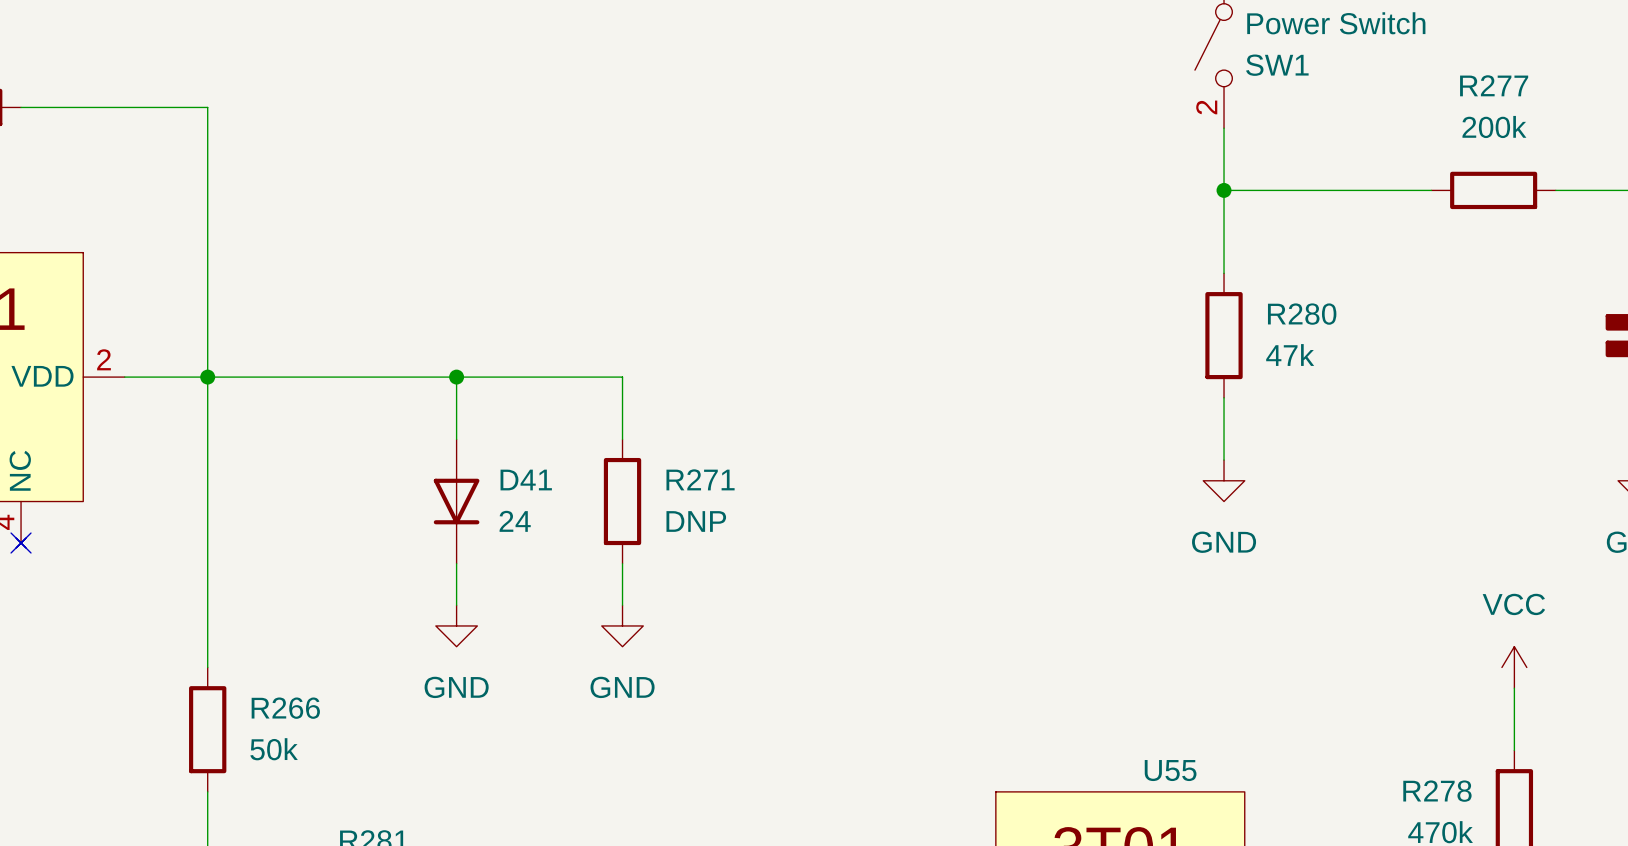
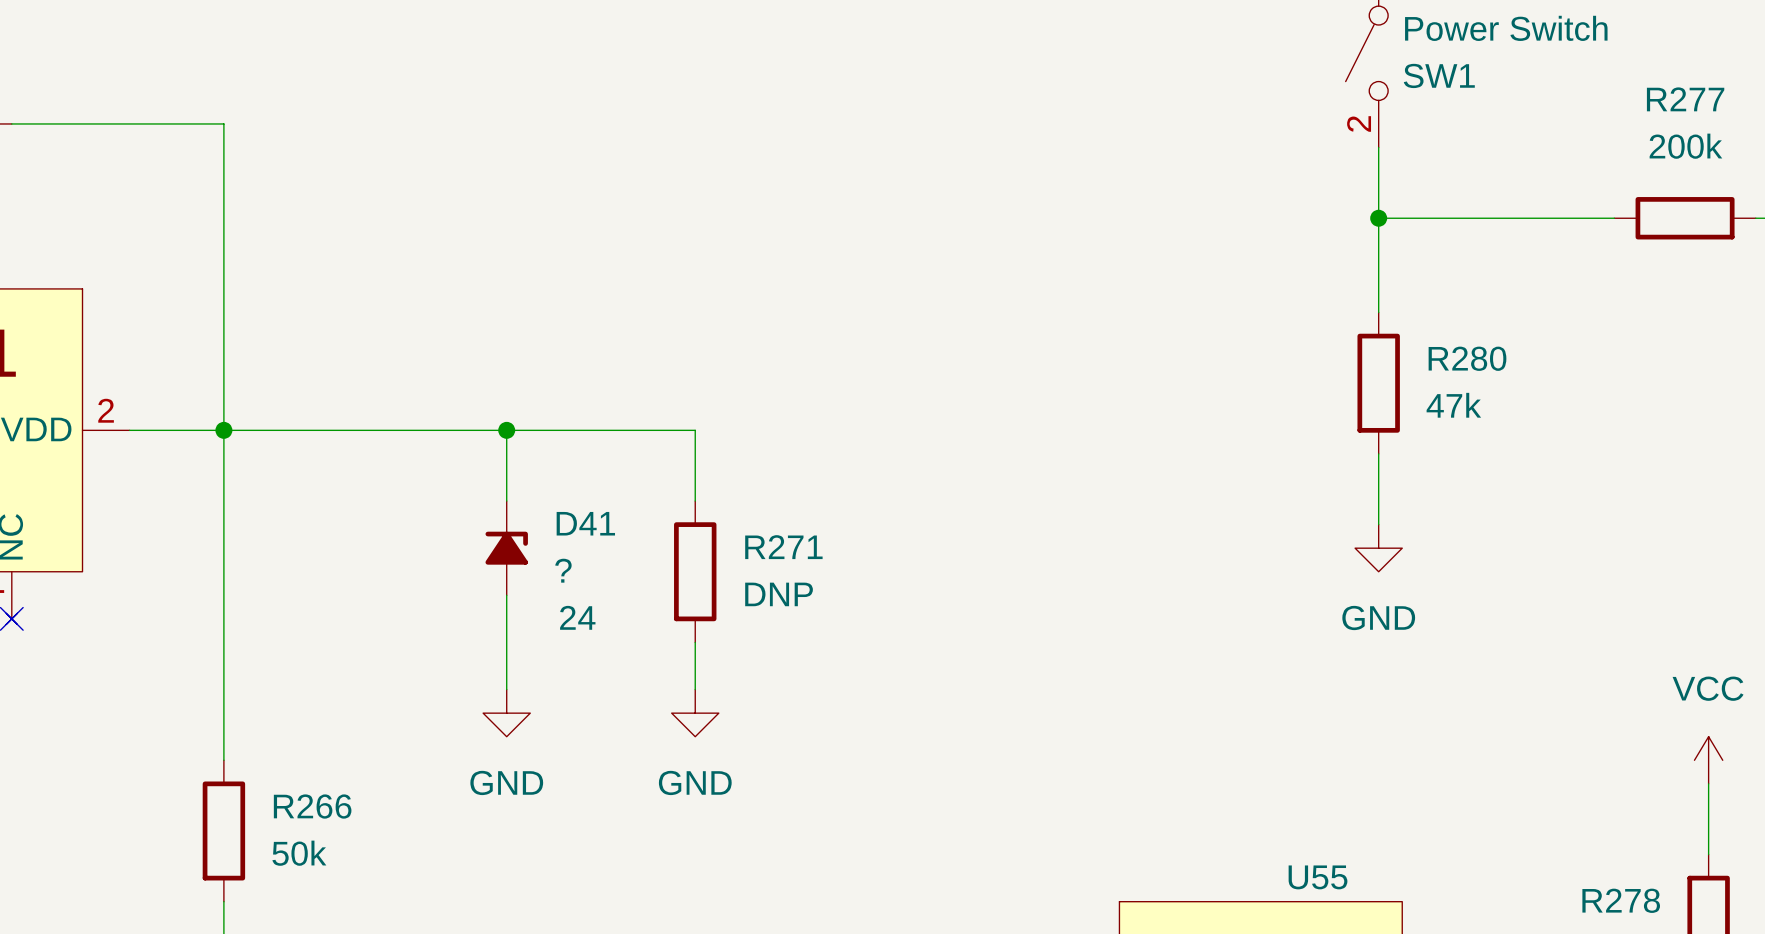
D41 symbol: [433, 439, 480, 564] -> [485, 501, 528, 596]
D41 value: 24 (515, 521) -> ? (563, 570)
D41 text: none -> 24 (577, 617)

